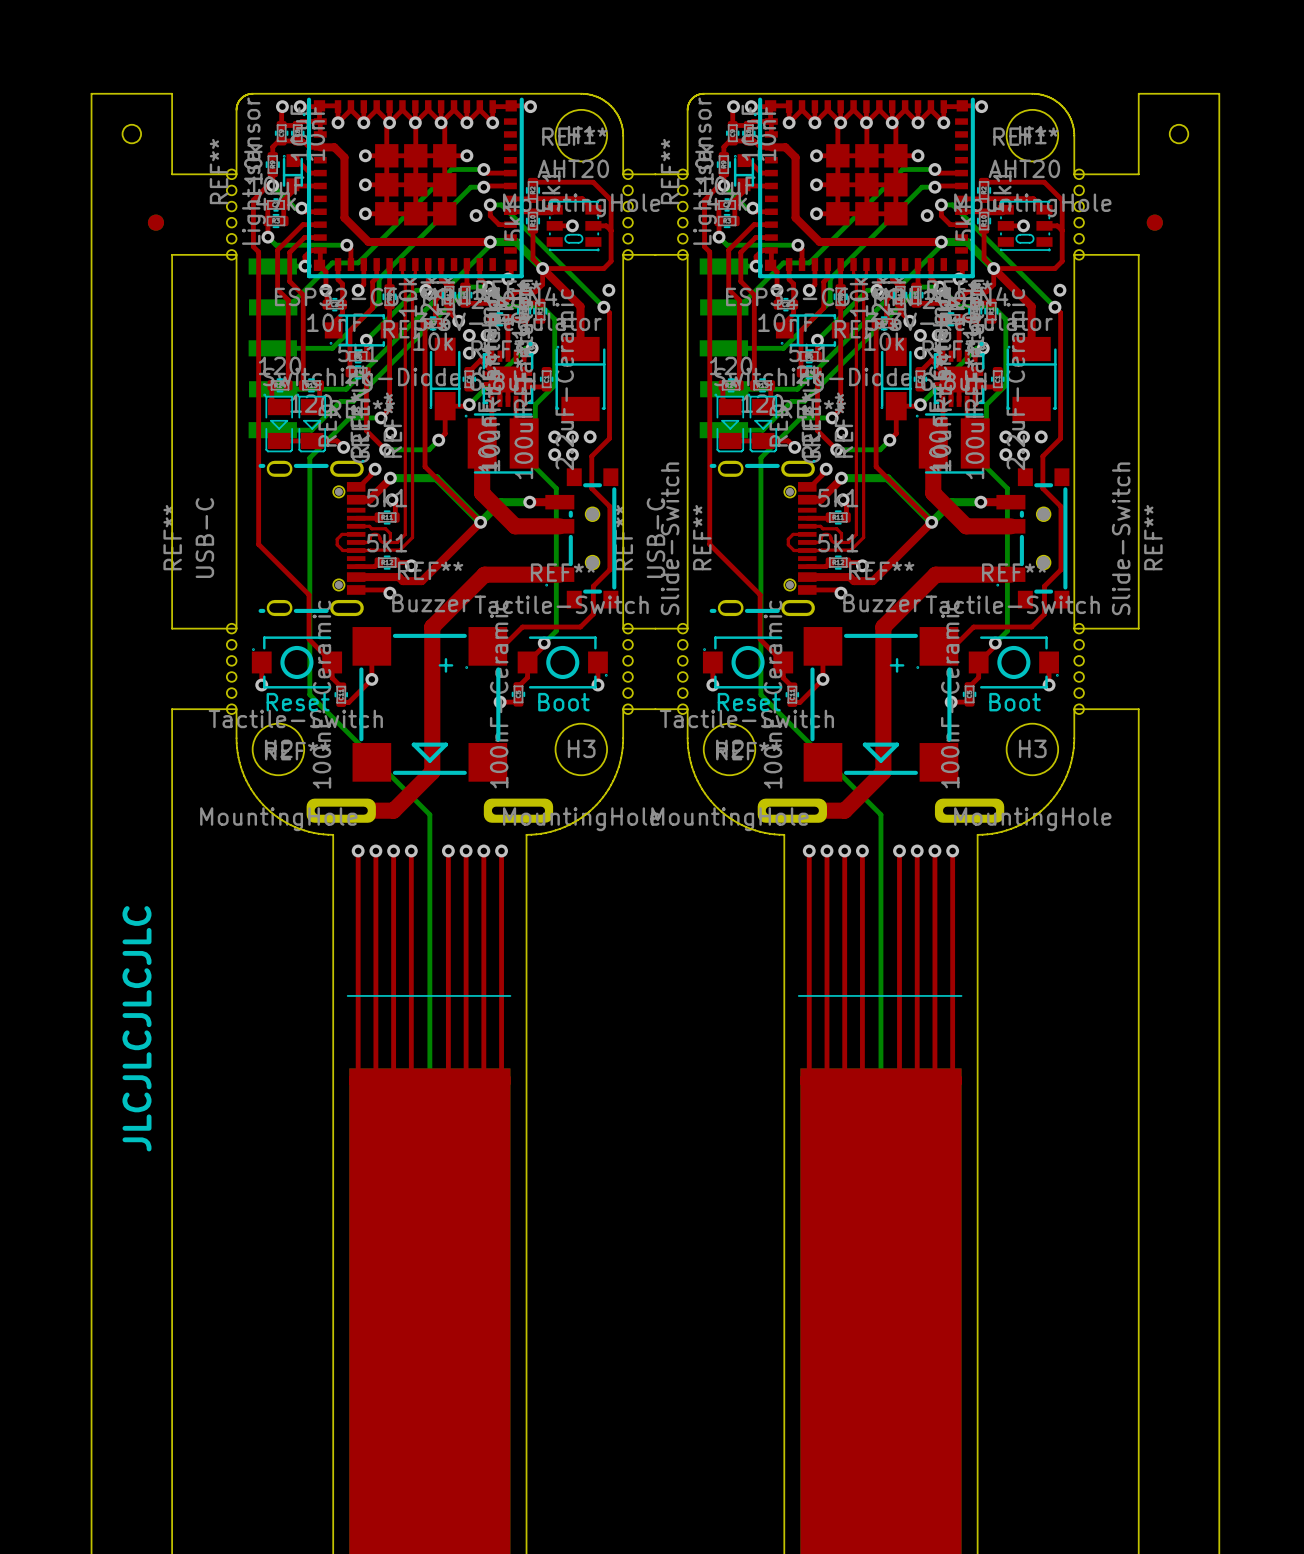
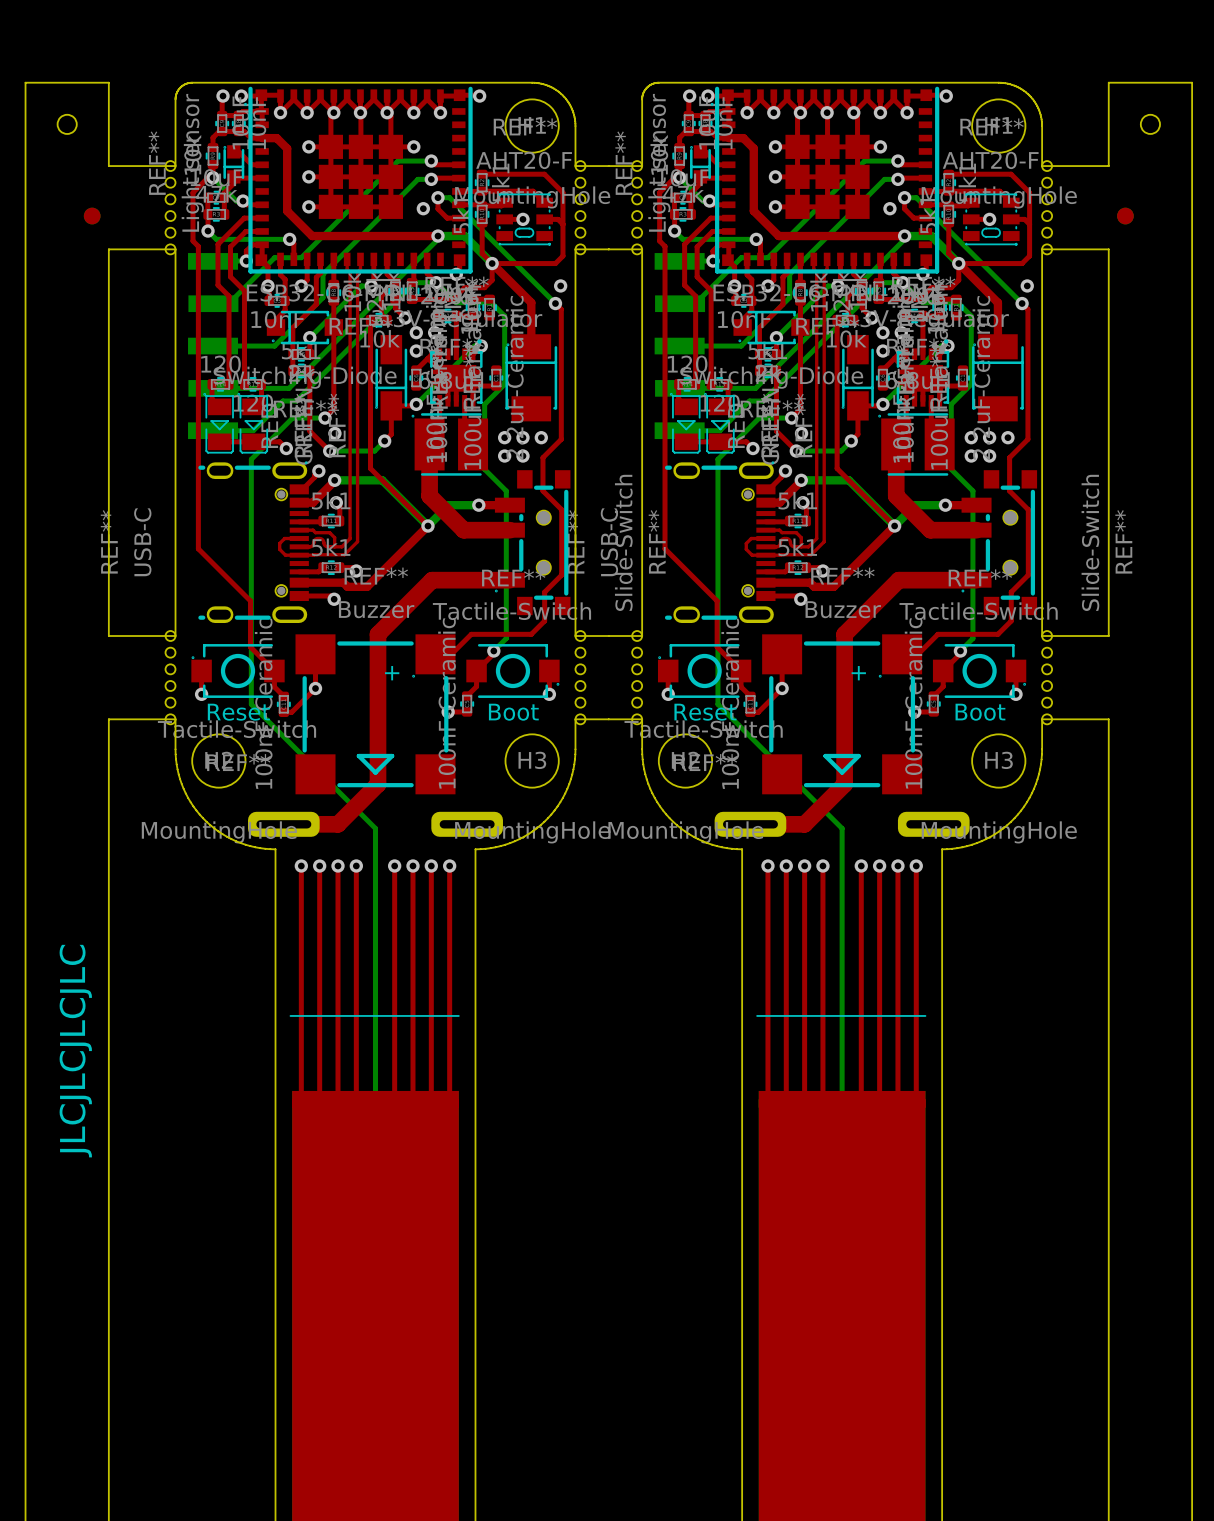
part value: AHT20 (573, 168) -> AHT20-F (524, 160)
part value: AHT20 (1024, 168) -> AHT20-F (990, 160)

